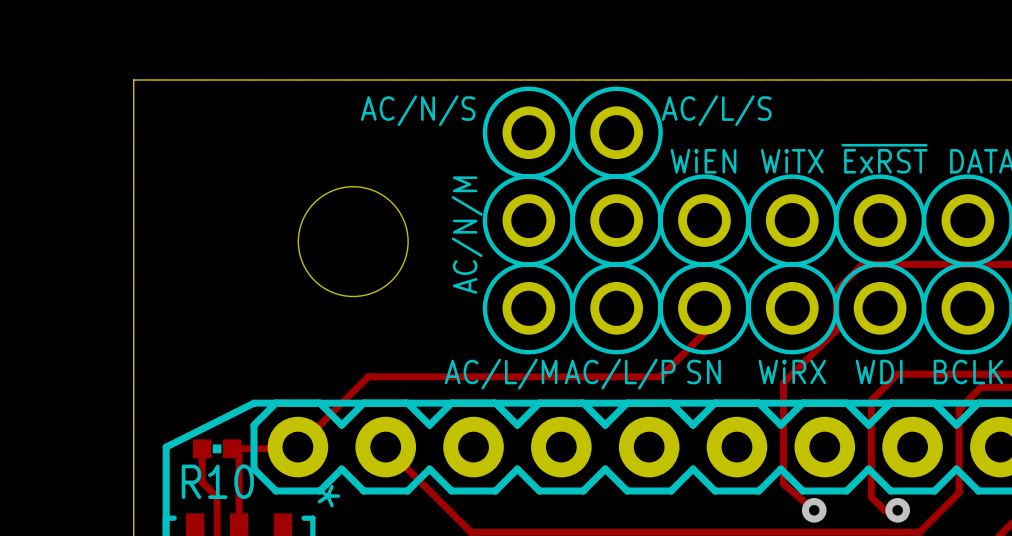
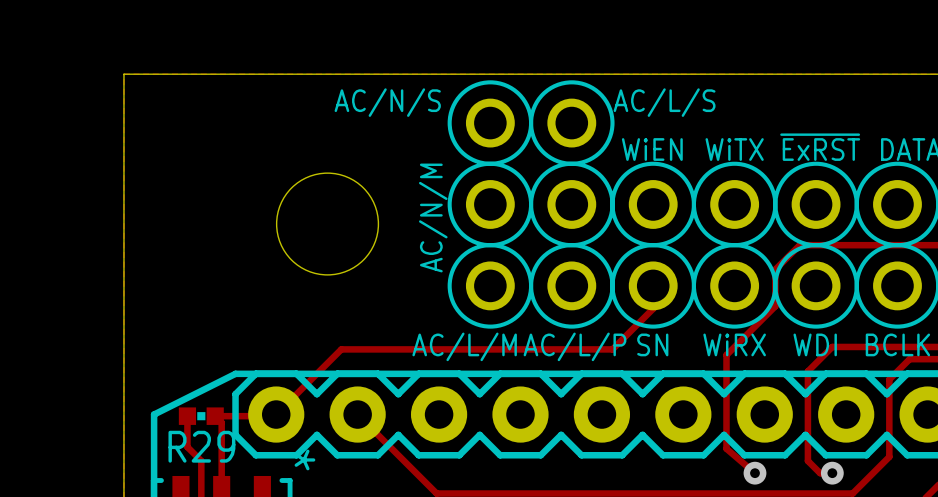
R10 name: R10 (217, 481) -> R29 (201, 446)

